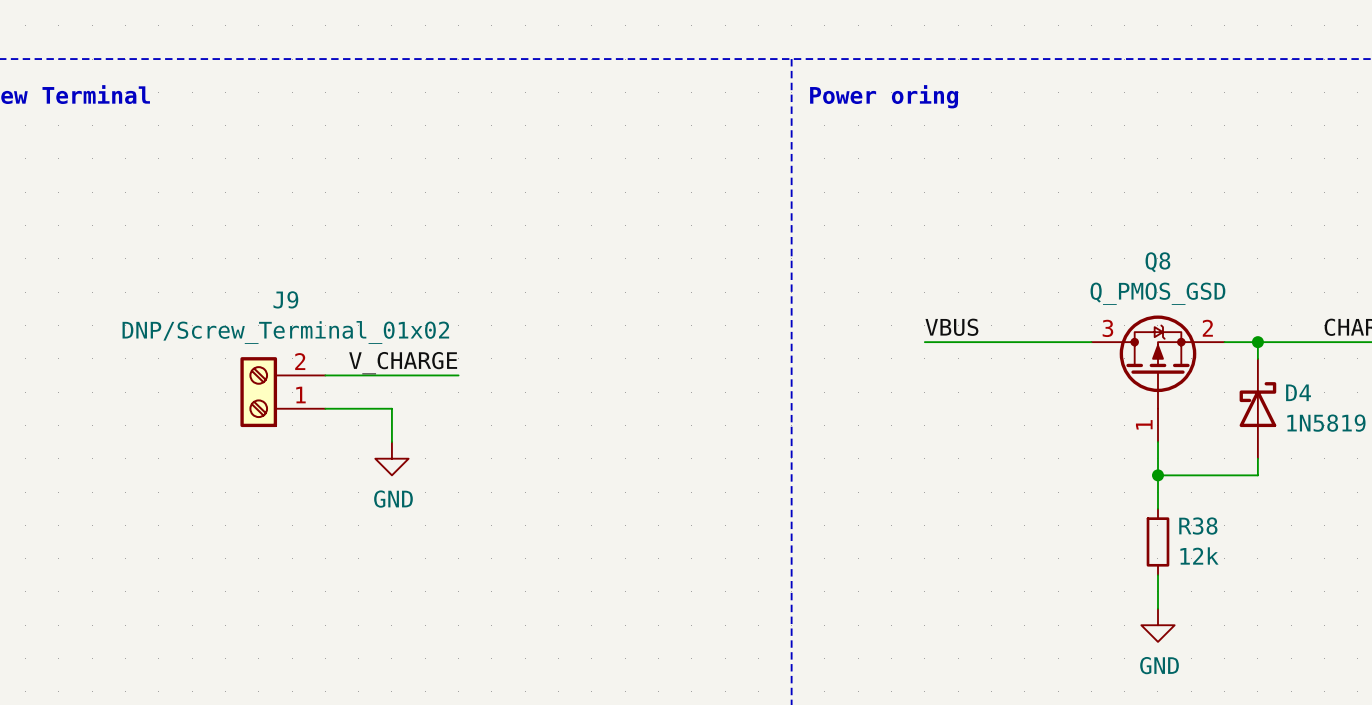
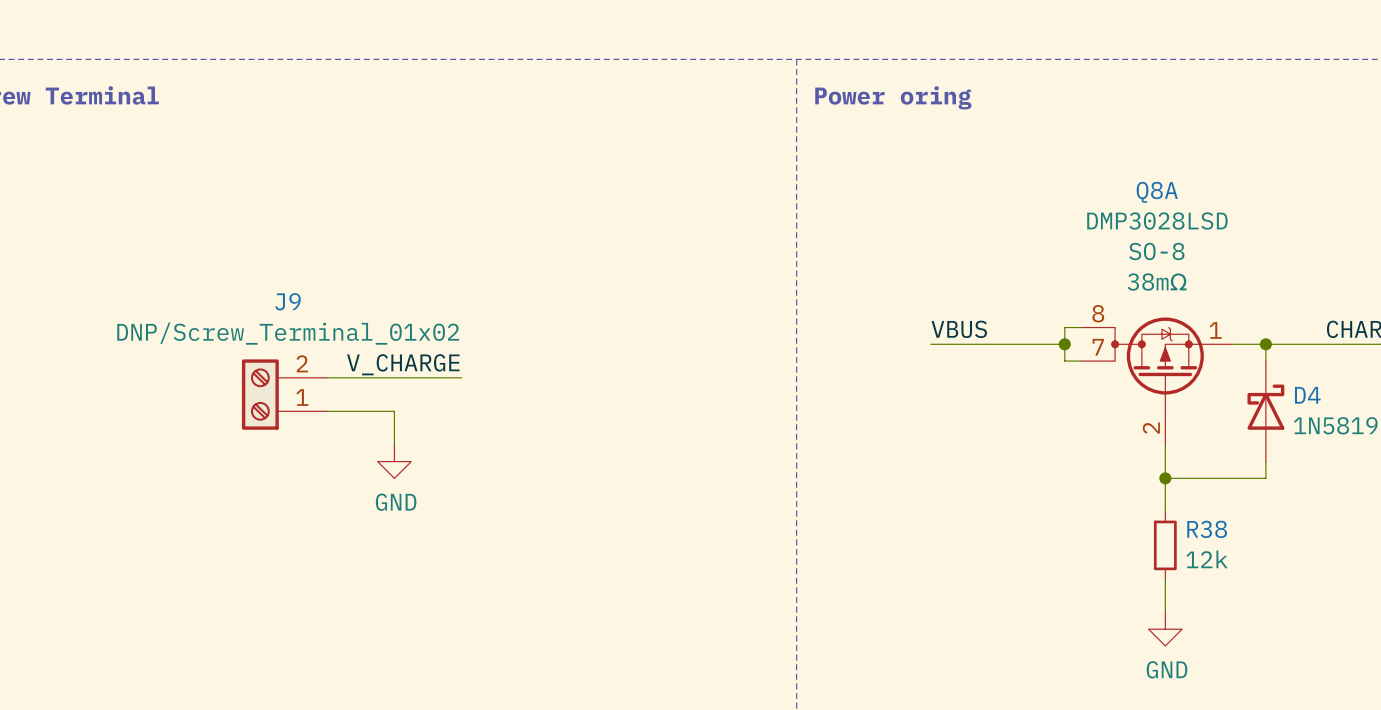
wire: none -> (1081, 327) (1064, 327) (1064, 361) (1081, 361)
wire: (1058, 342) (1091, 342) -> none
junction: none -> (1064, 344)
Q8A: none -> DMP3028LSD (1156, 381)
Q8: Q_PMOS_GSD (1157, 378) -> none

